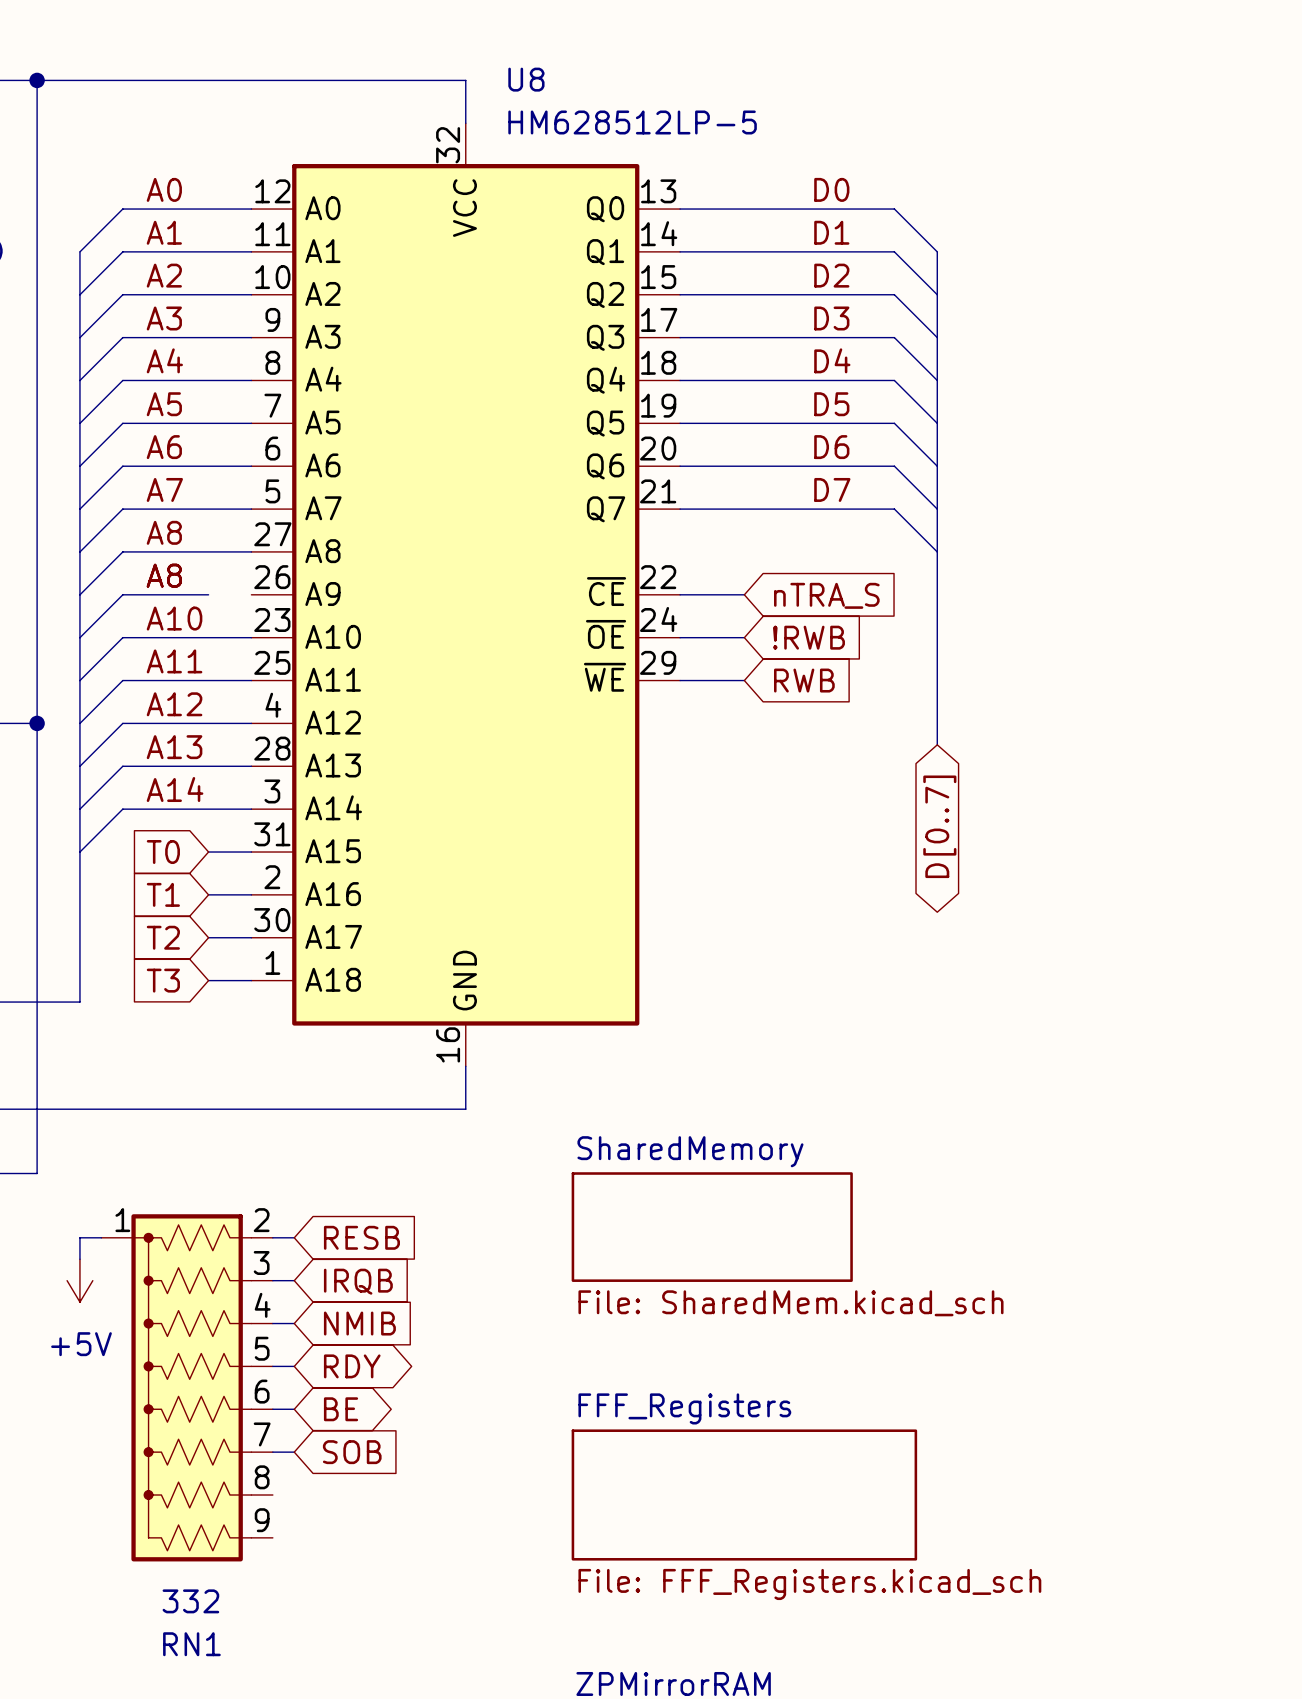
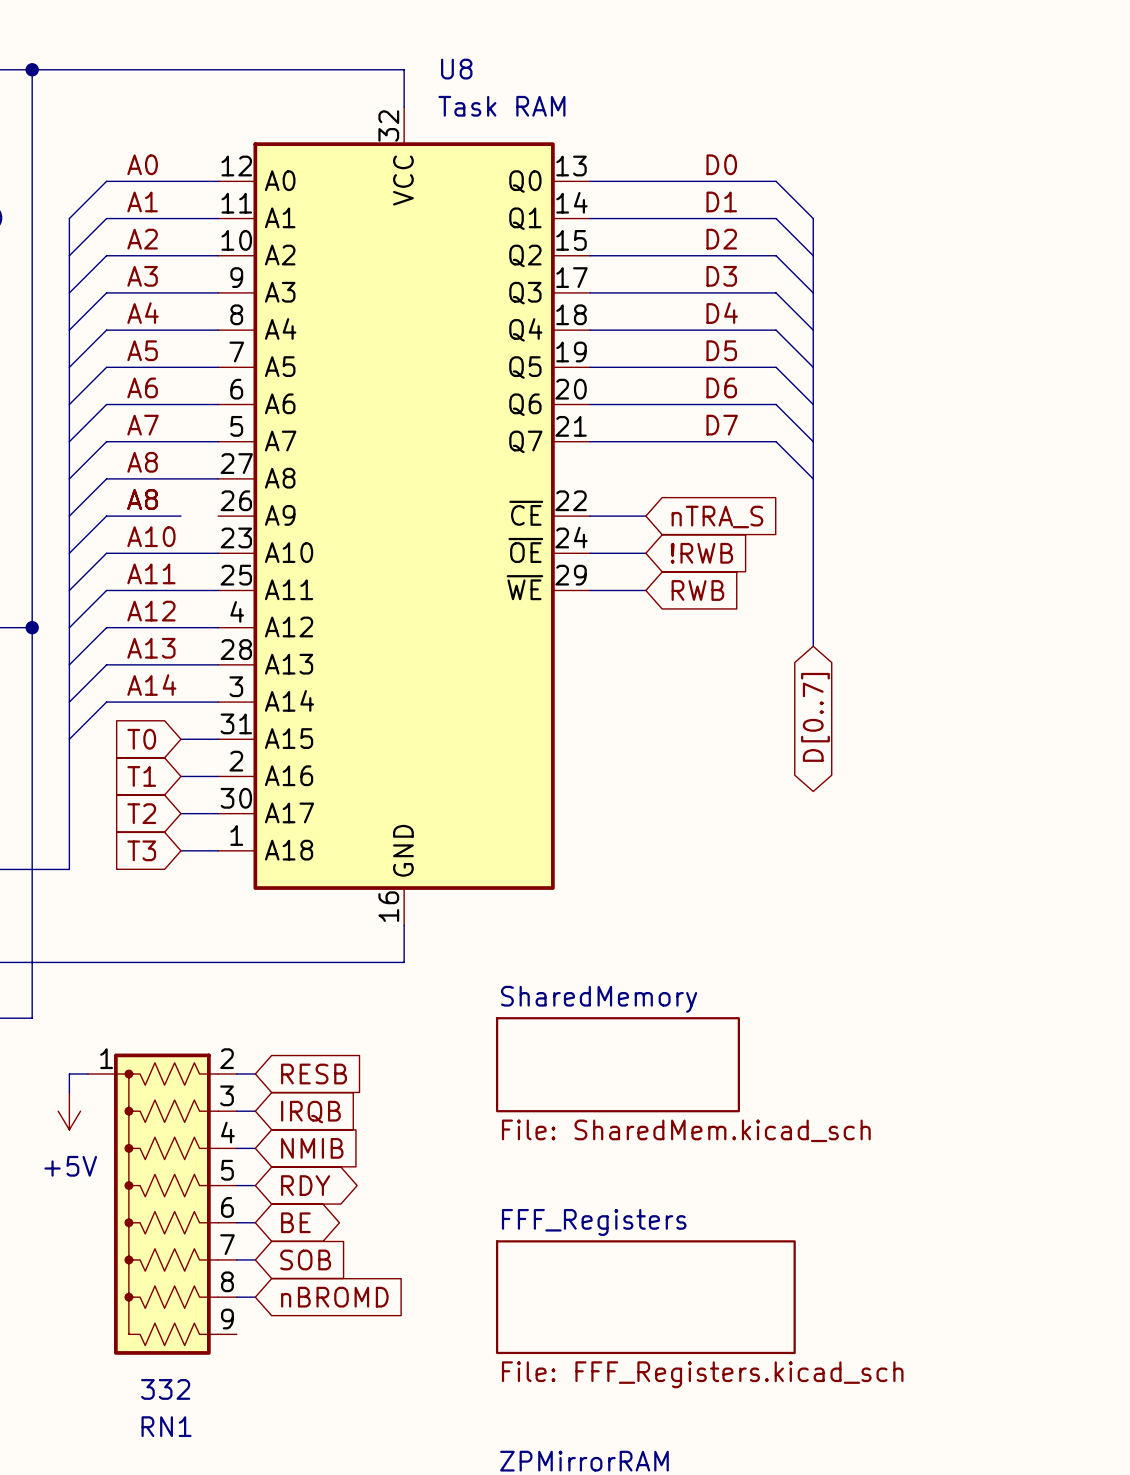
U8 value: HM628512LP-5 (632, 122) -> Task RAM (501, 106)
wire: none -> (236, 1297) (255, 1297)
global label: none -> nBROMD (334, 1297)

